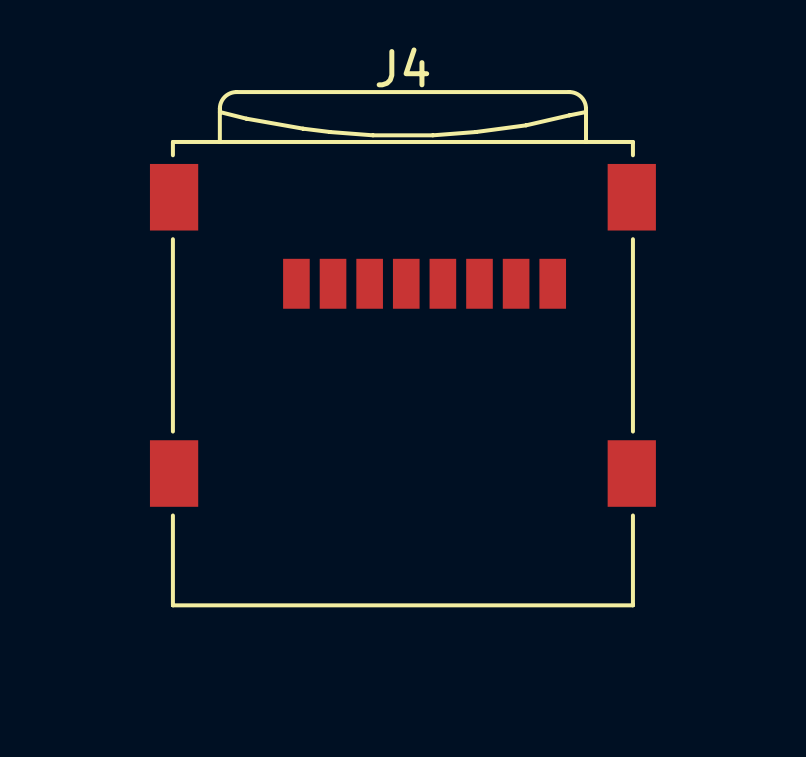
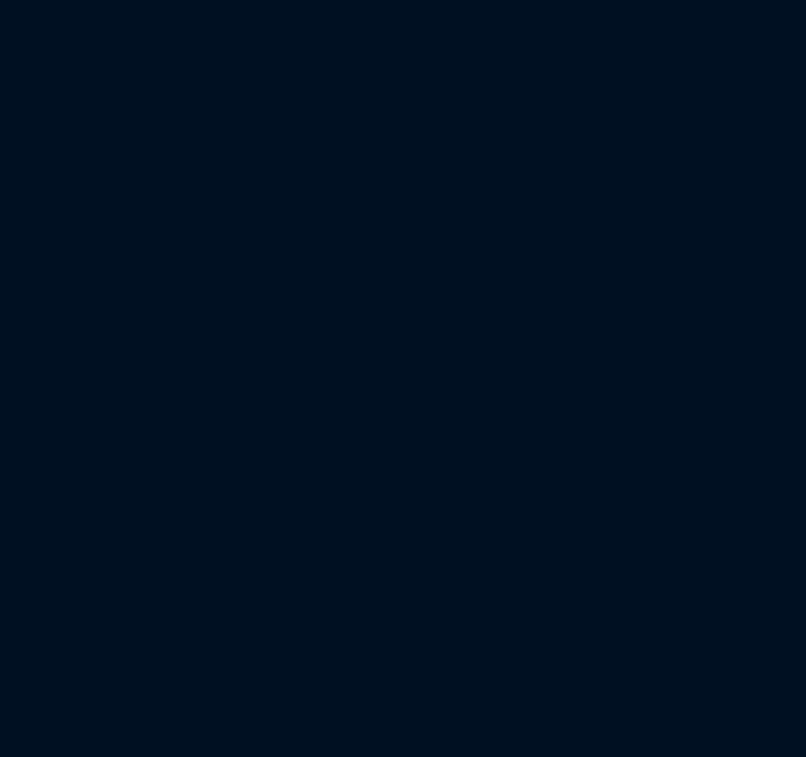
J4: (402, 348) -> none

